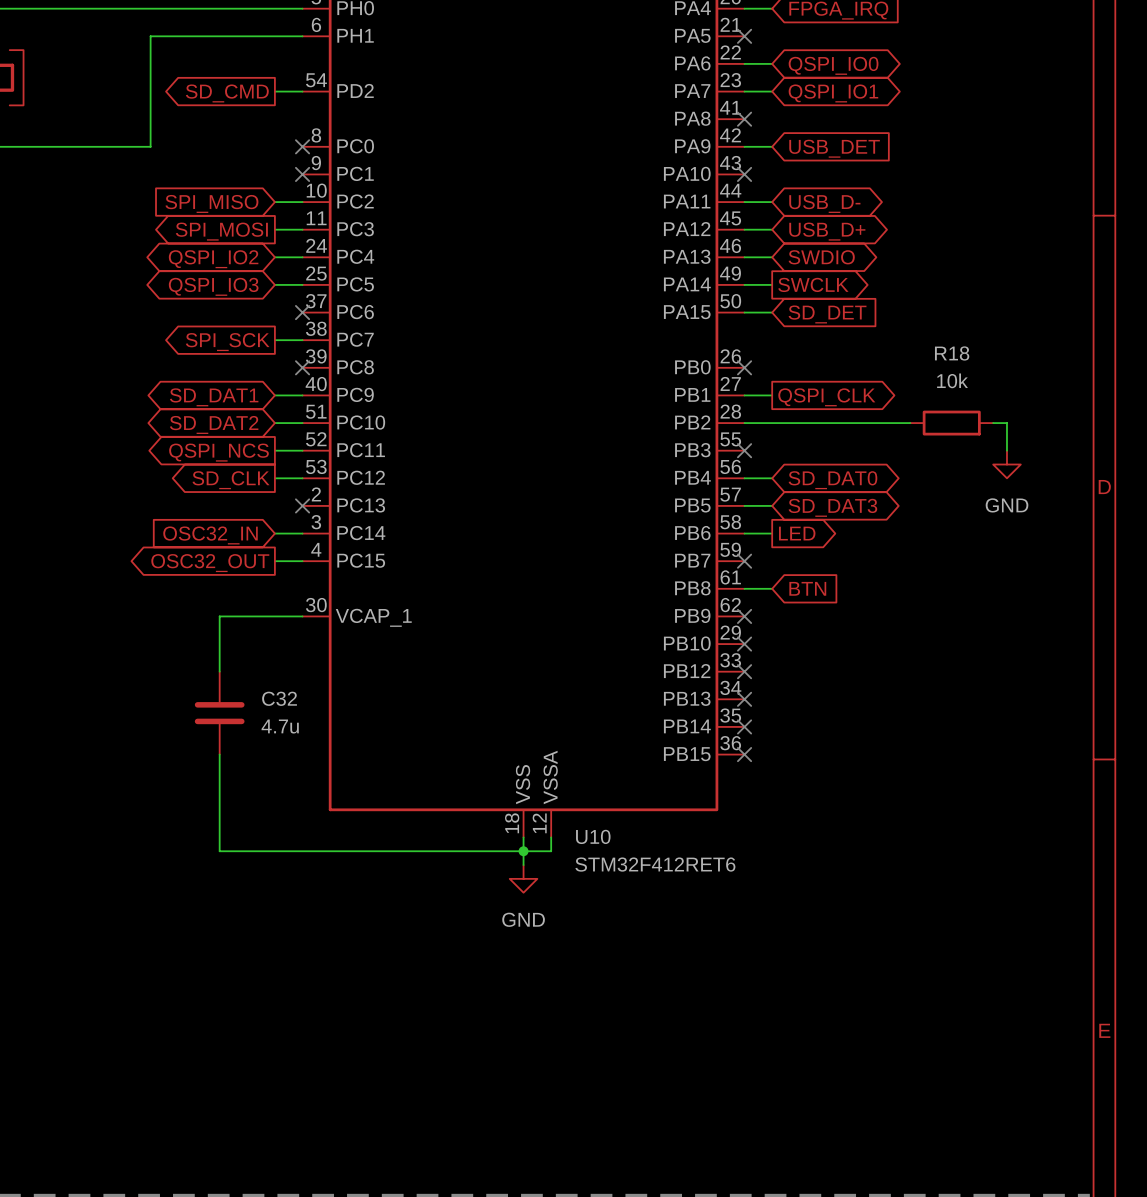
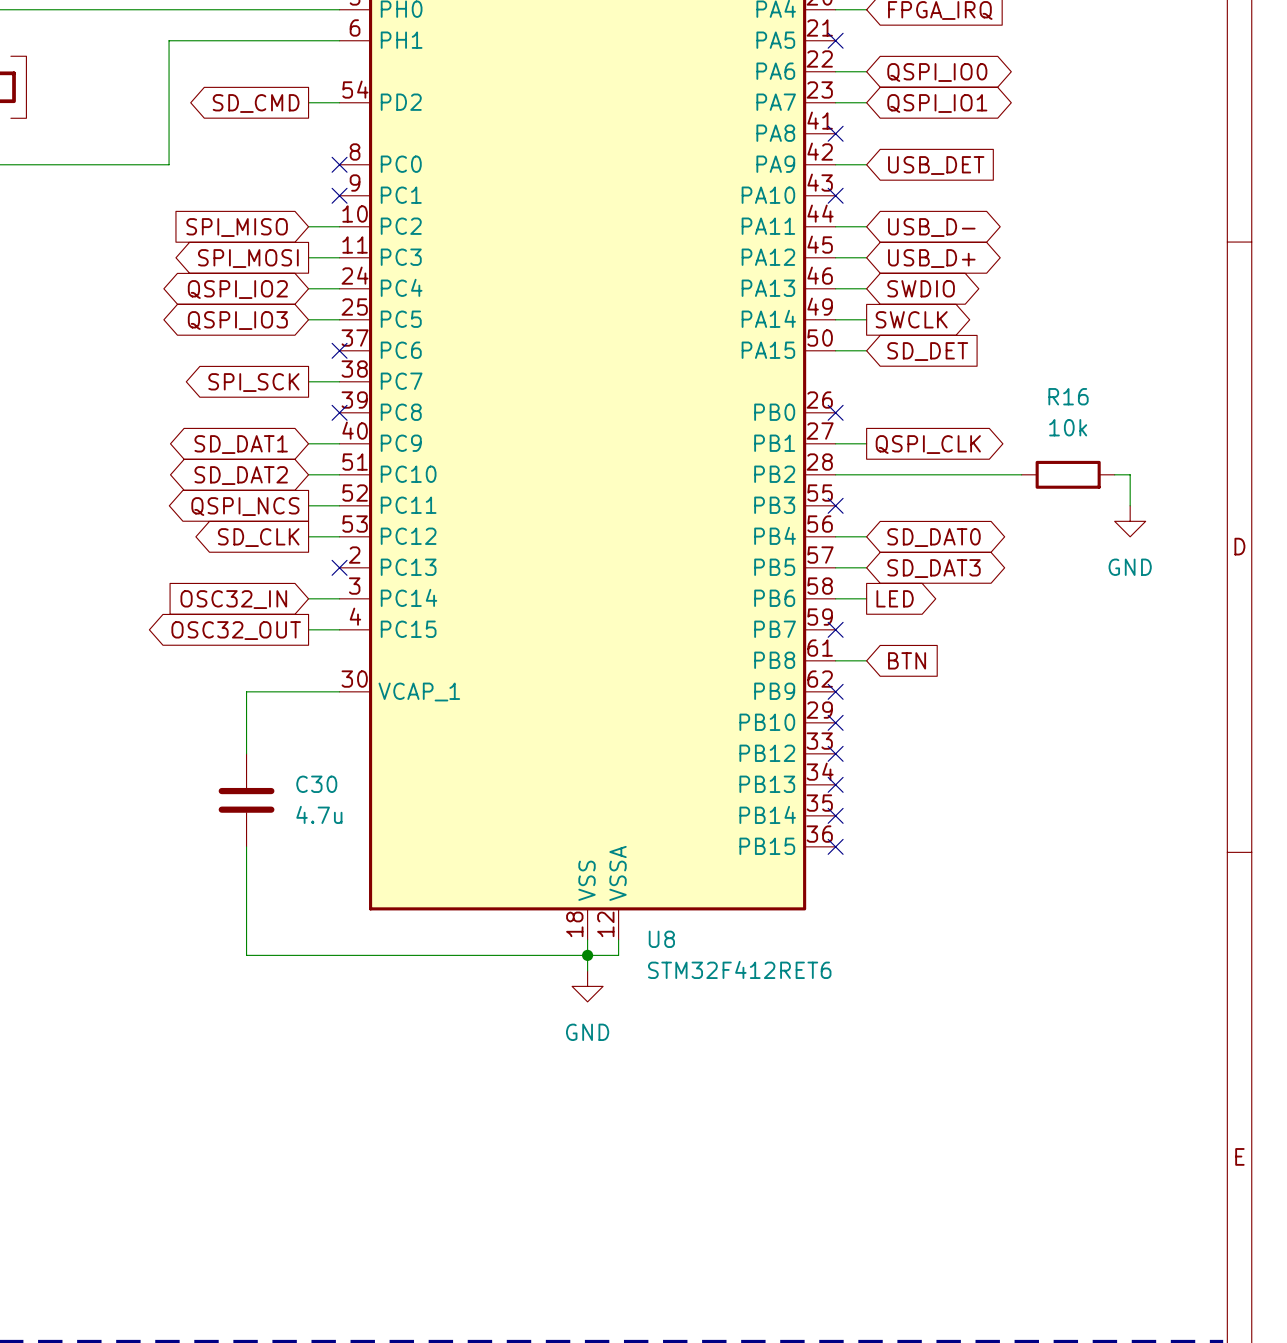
R18 name: R18 (952, 353) -> R16 (1068, 396)
C32 name: C32 (279, 698) -> C30 (316, 784)
U10 name: U10 (593, 836) -> U8 (661, 939)

